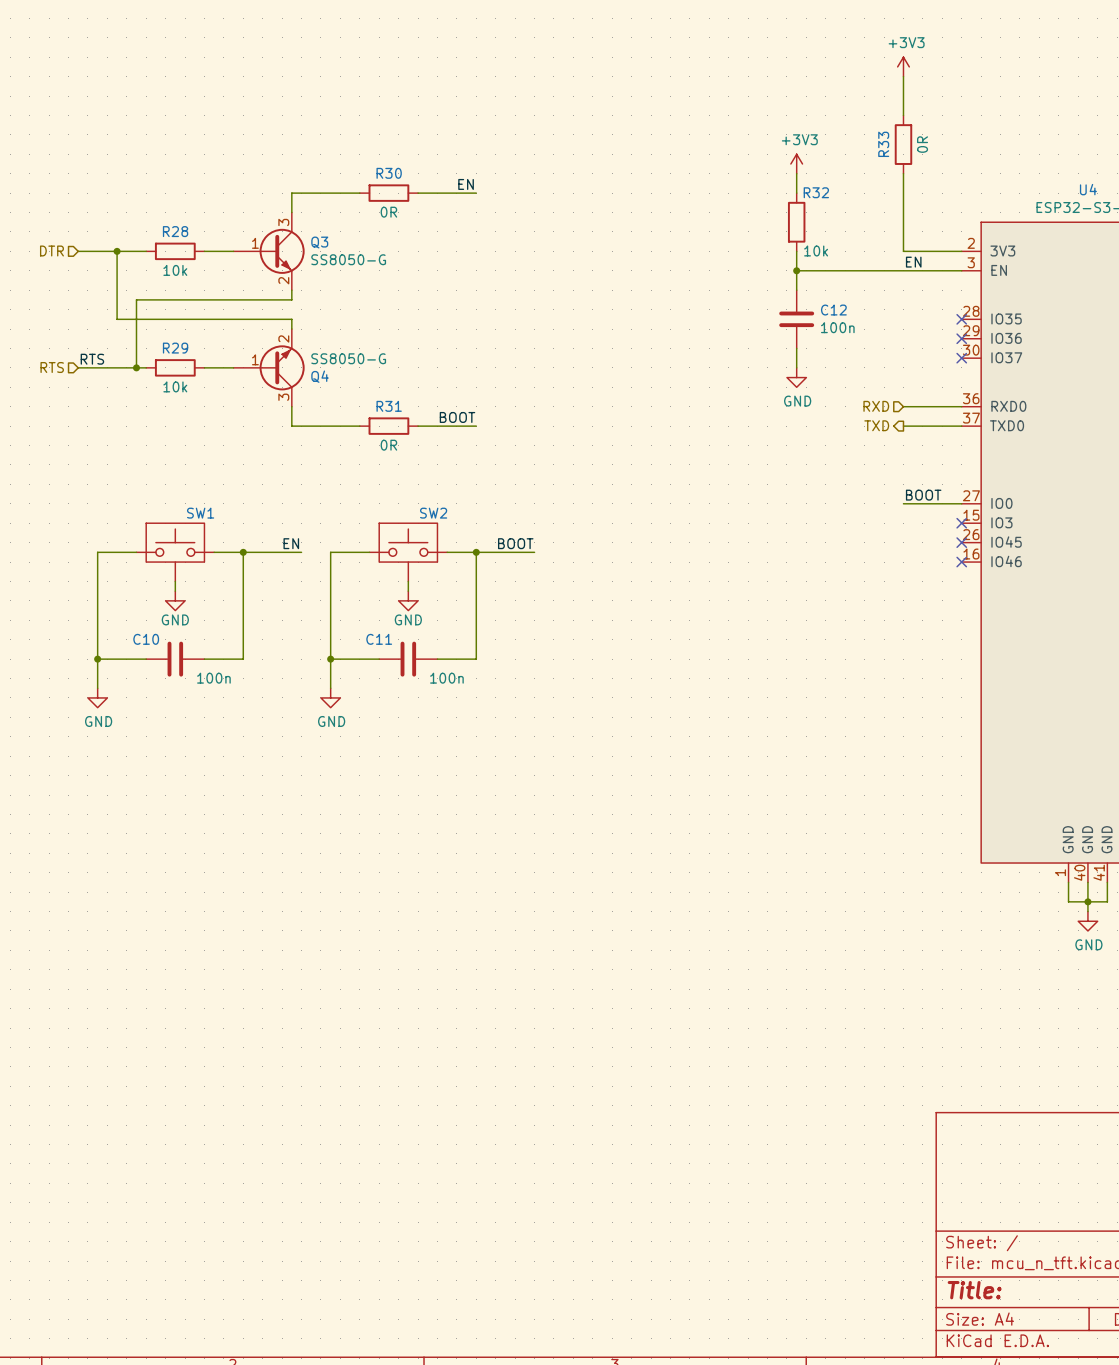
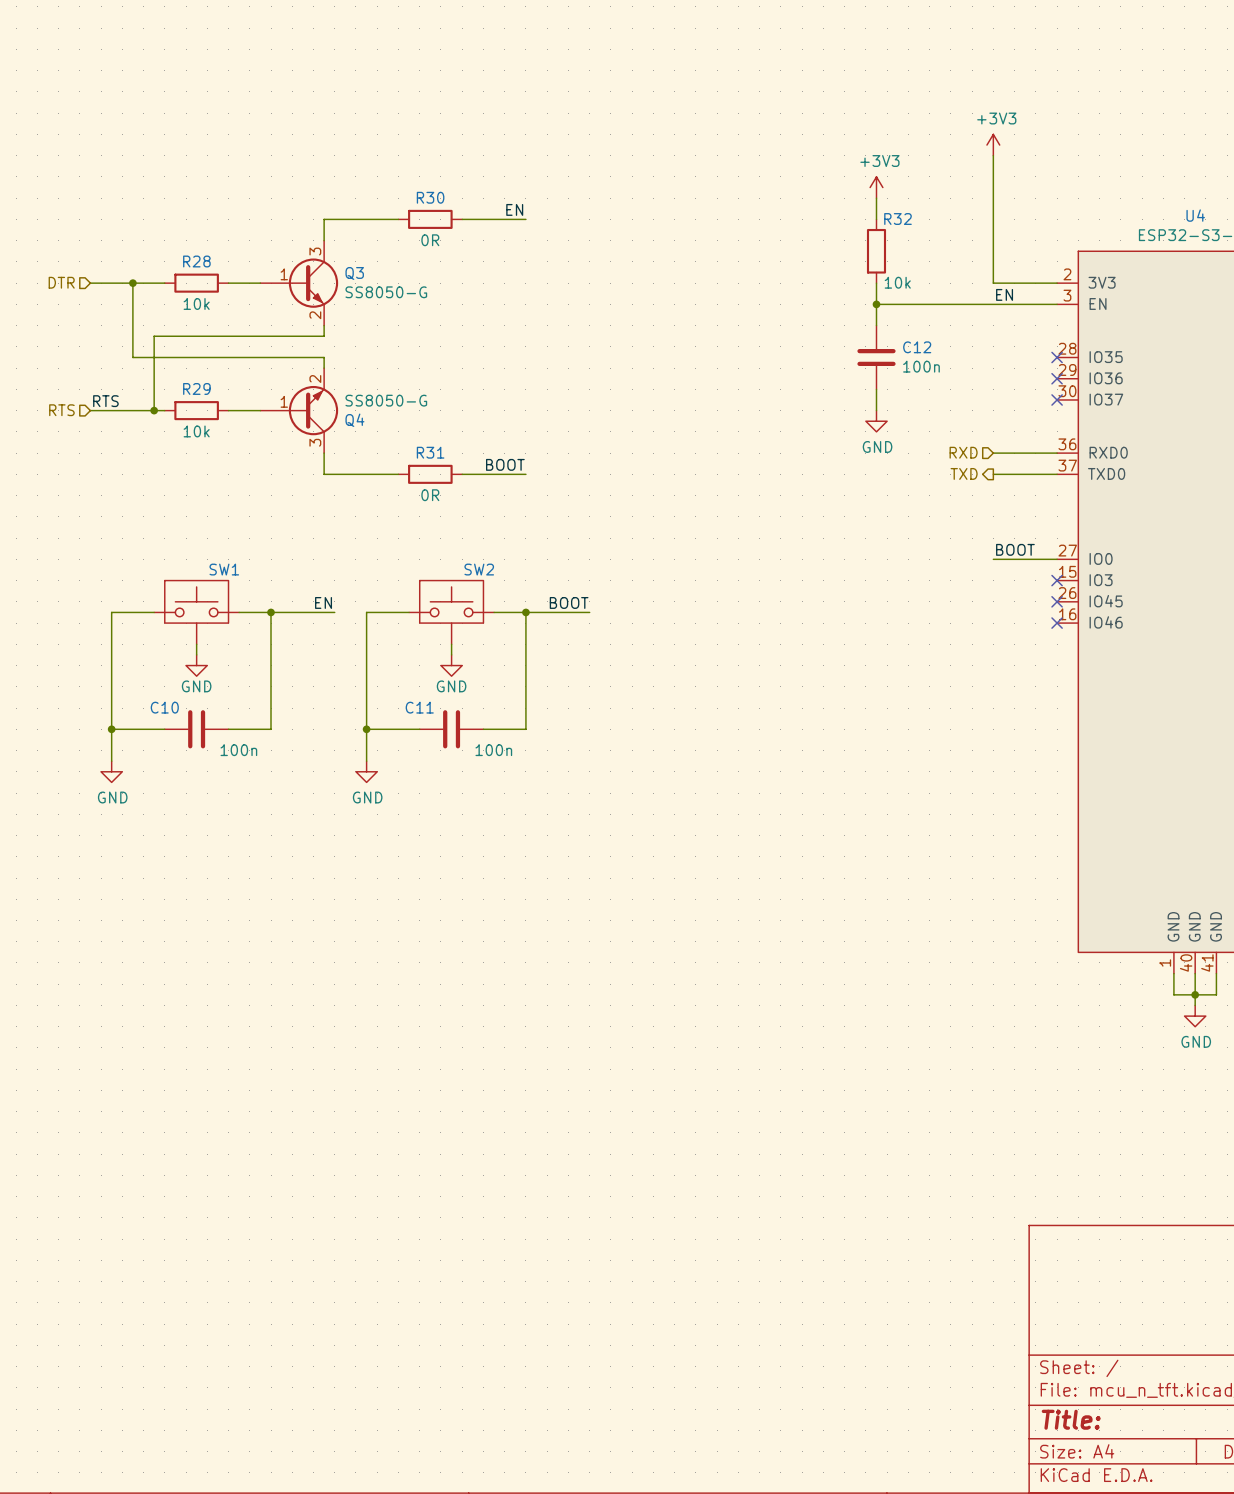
power symbol position: +3V3 (903, 66) -> +3V3 (993, 145)
wire: (903, 76) (903, 115) -> (993, 155) (993, 198)
R33: 0R (903, 144) -> none

